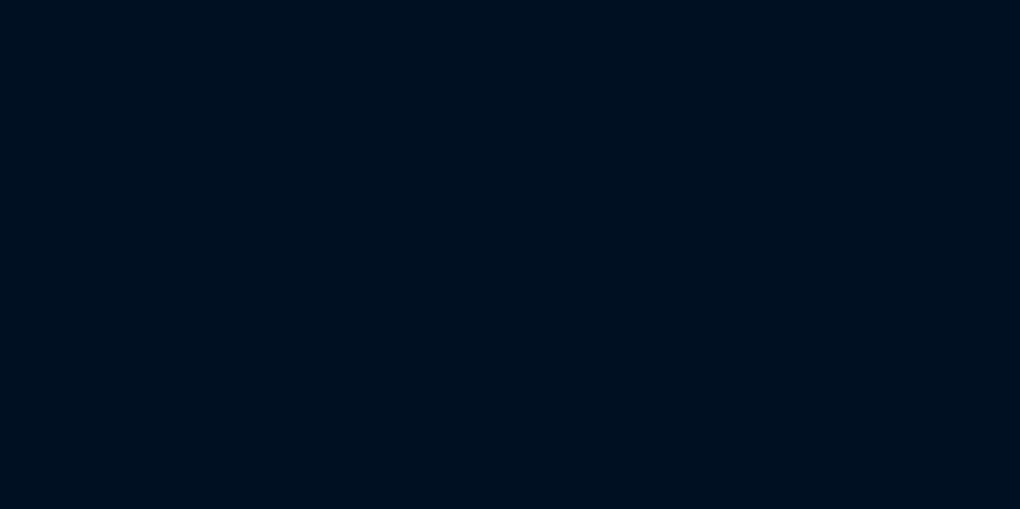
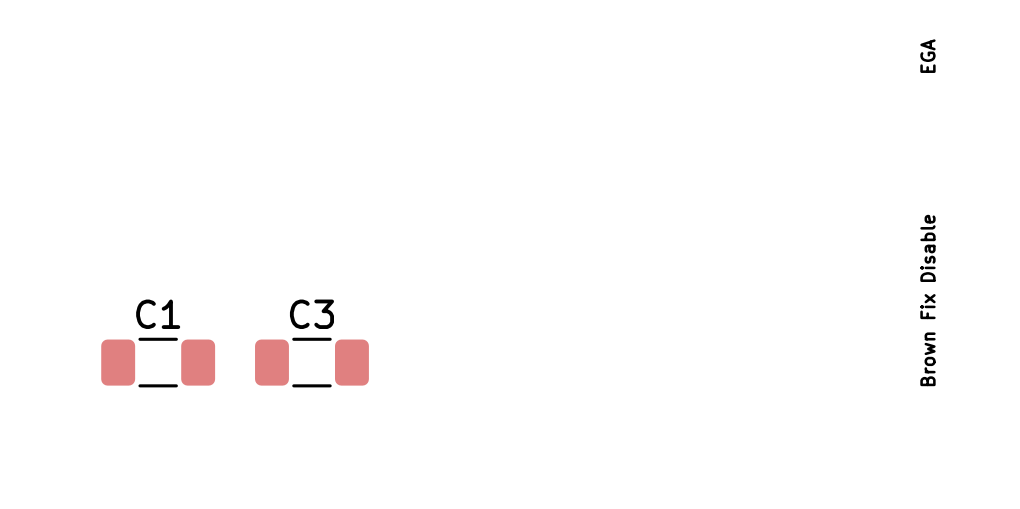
text: none -> EGA (927, 56)
text: none -> Brown Fix Disable (927, 300)
C1: none -> (158, 362)
C3: none -> (311, 362)

